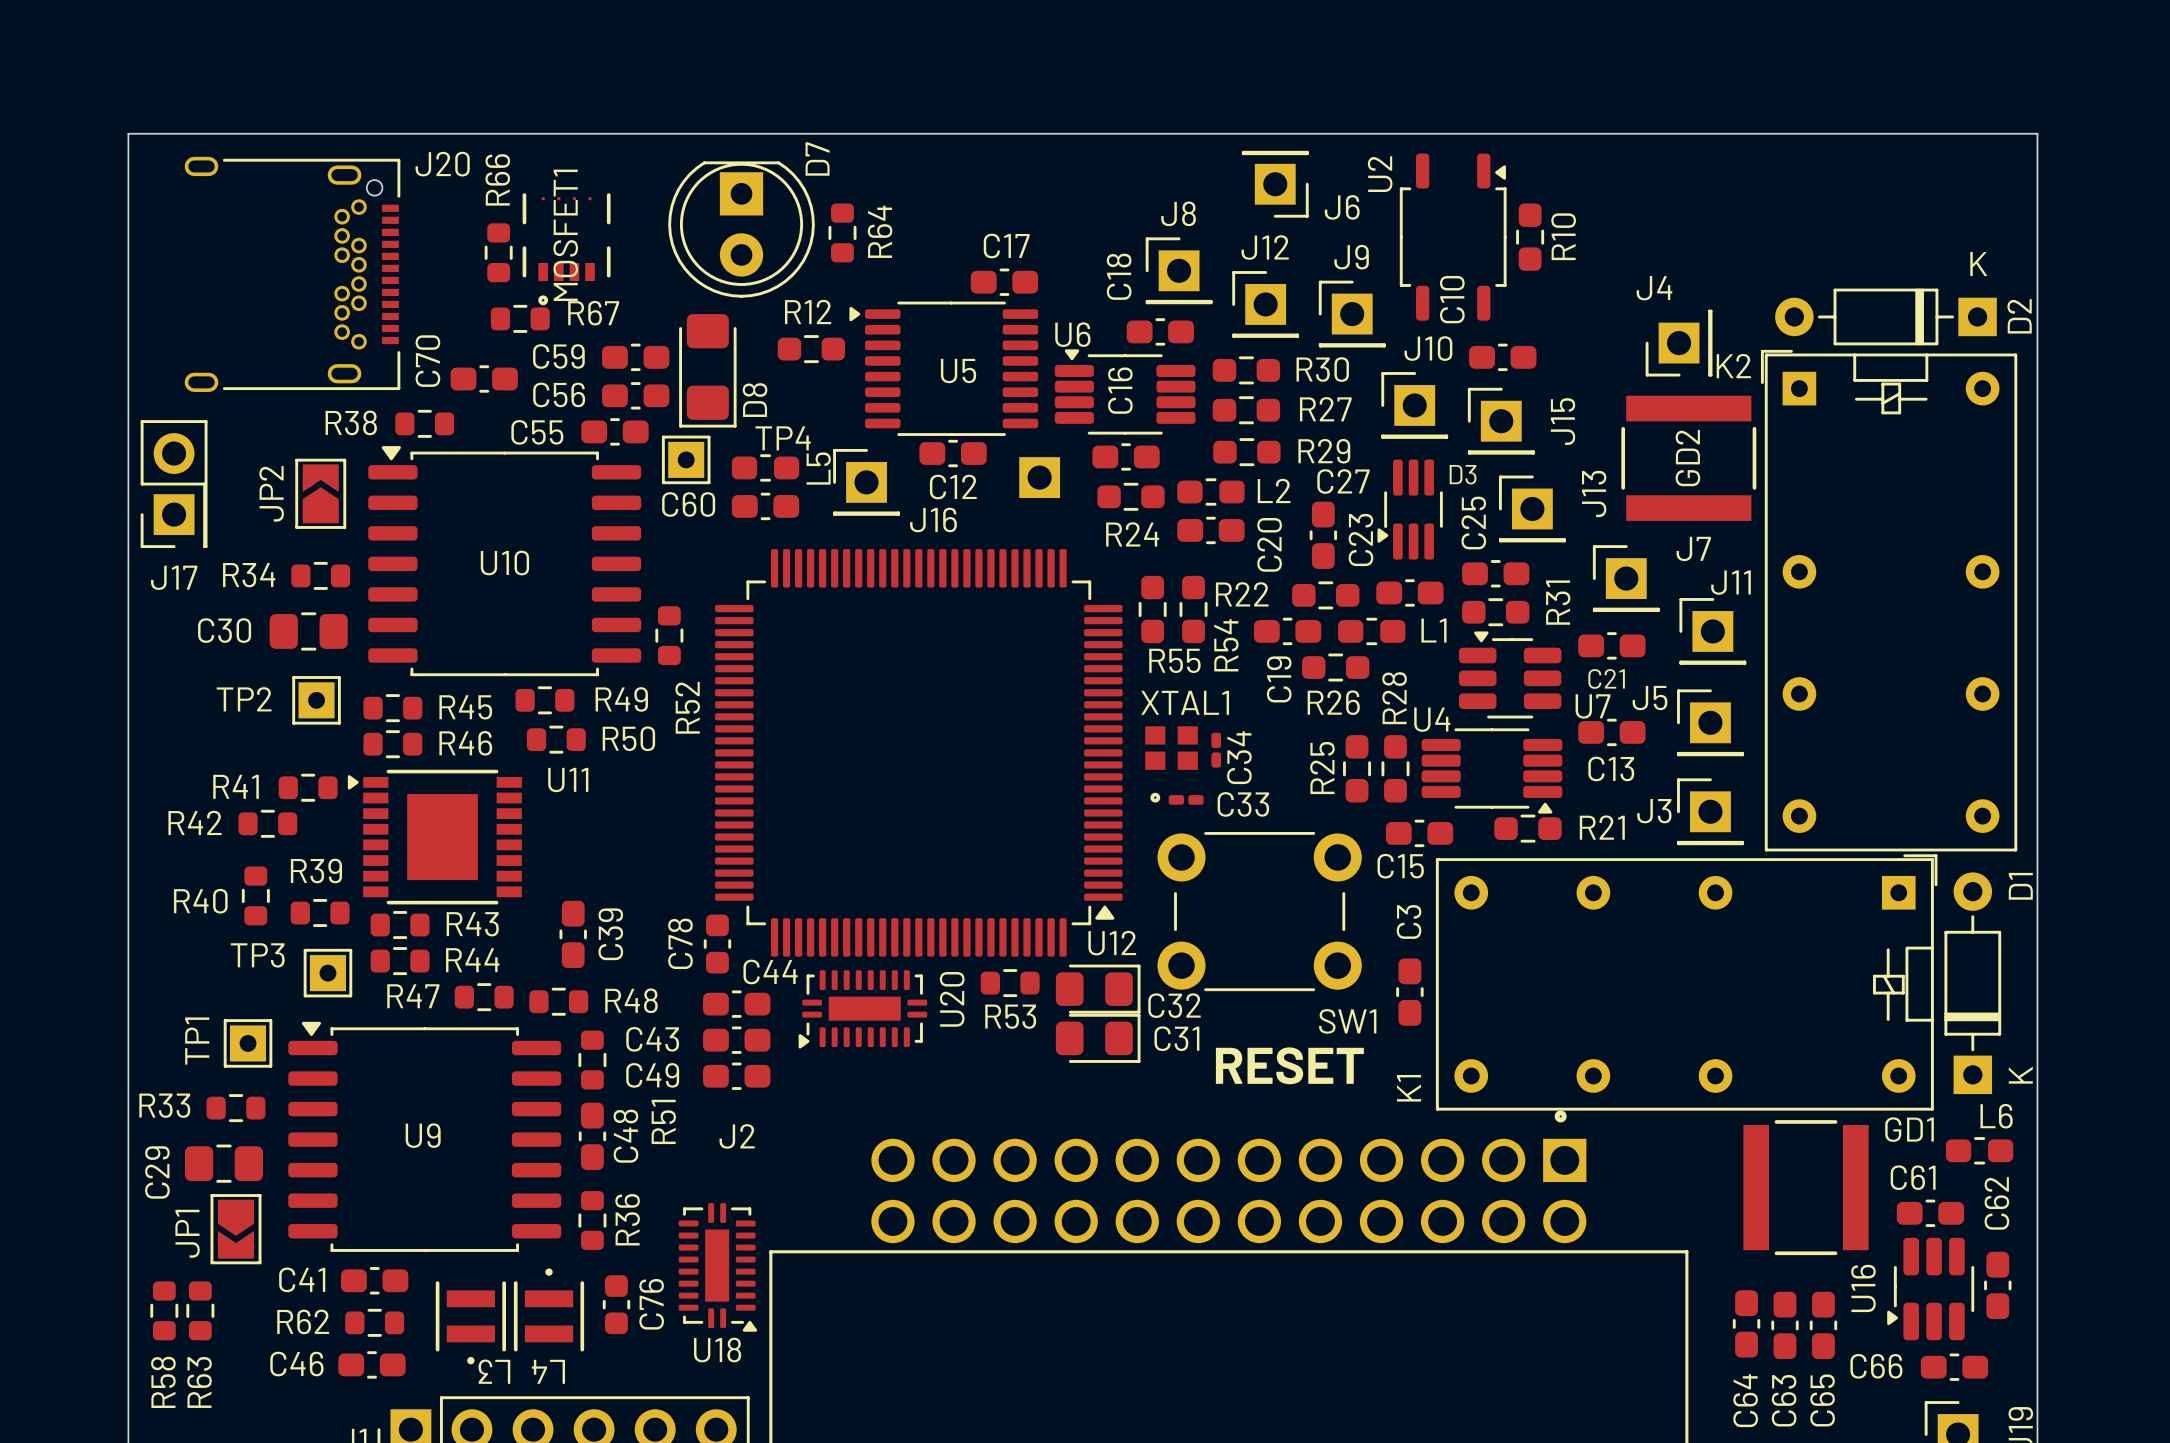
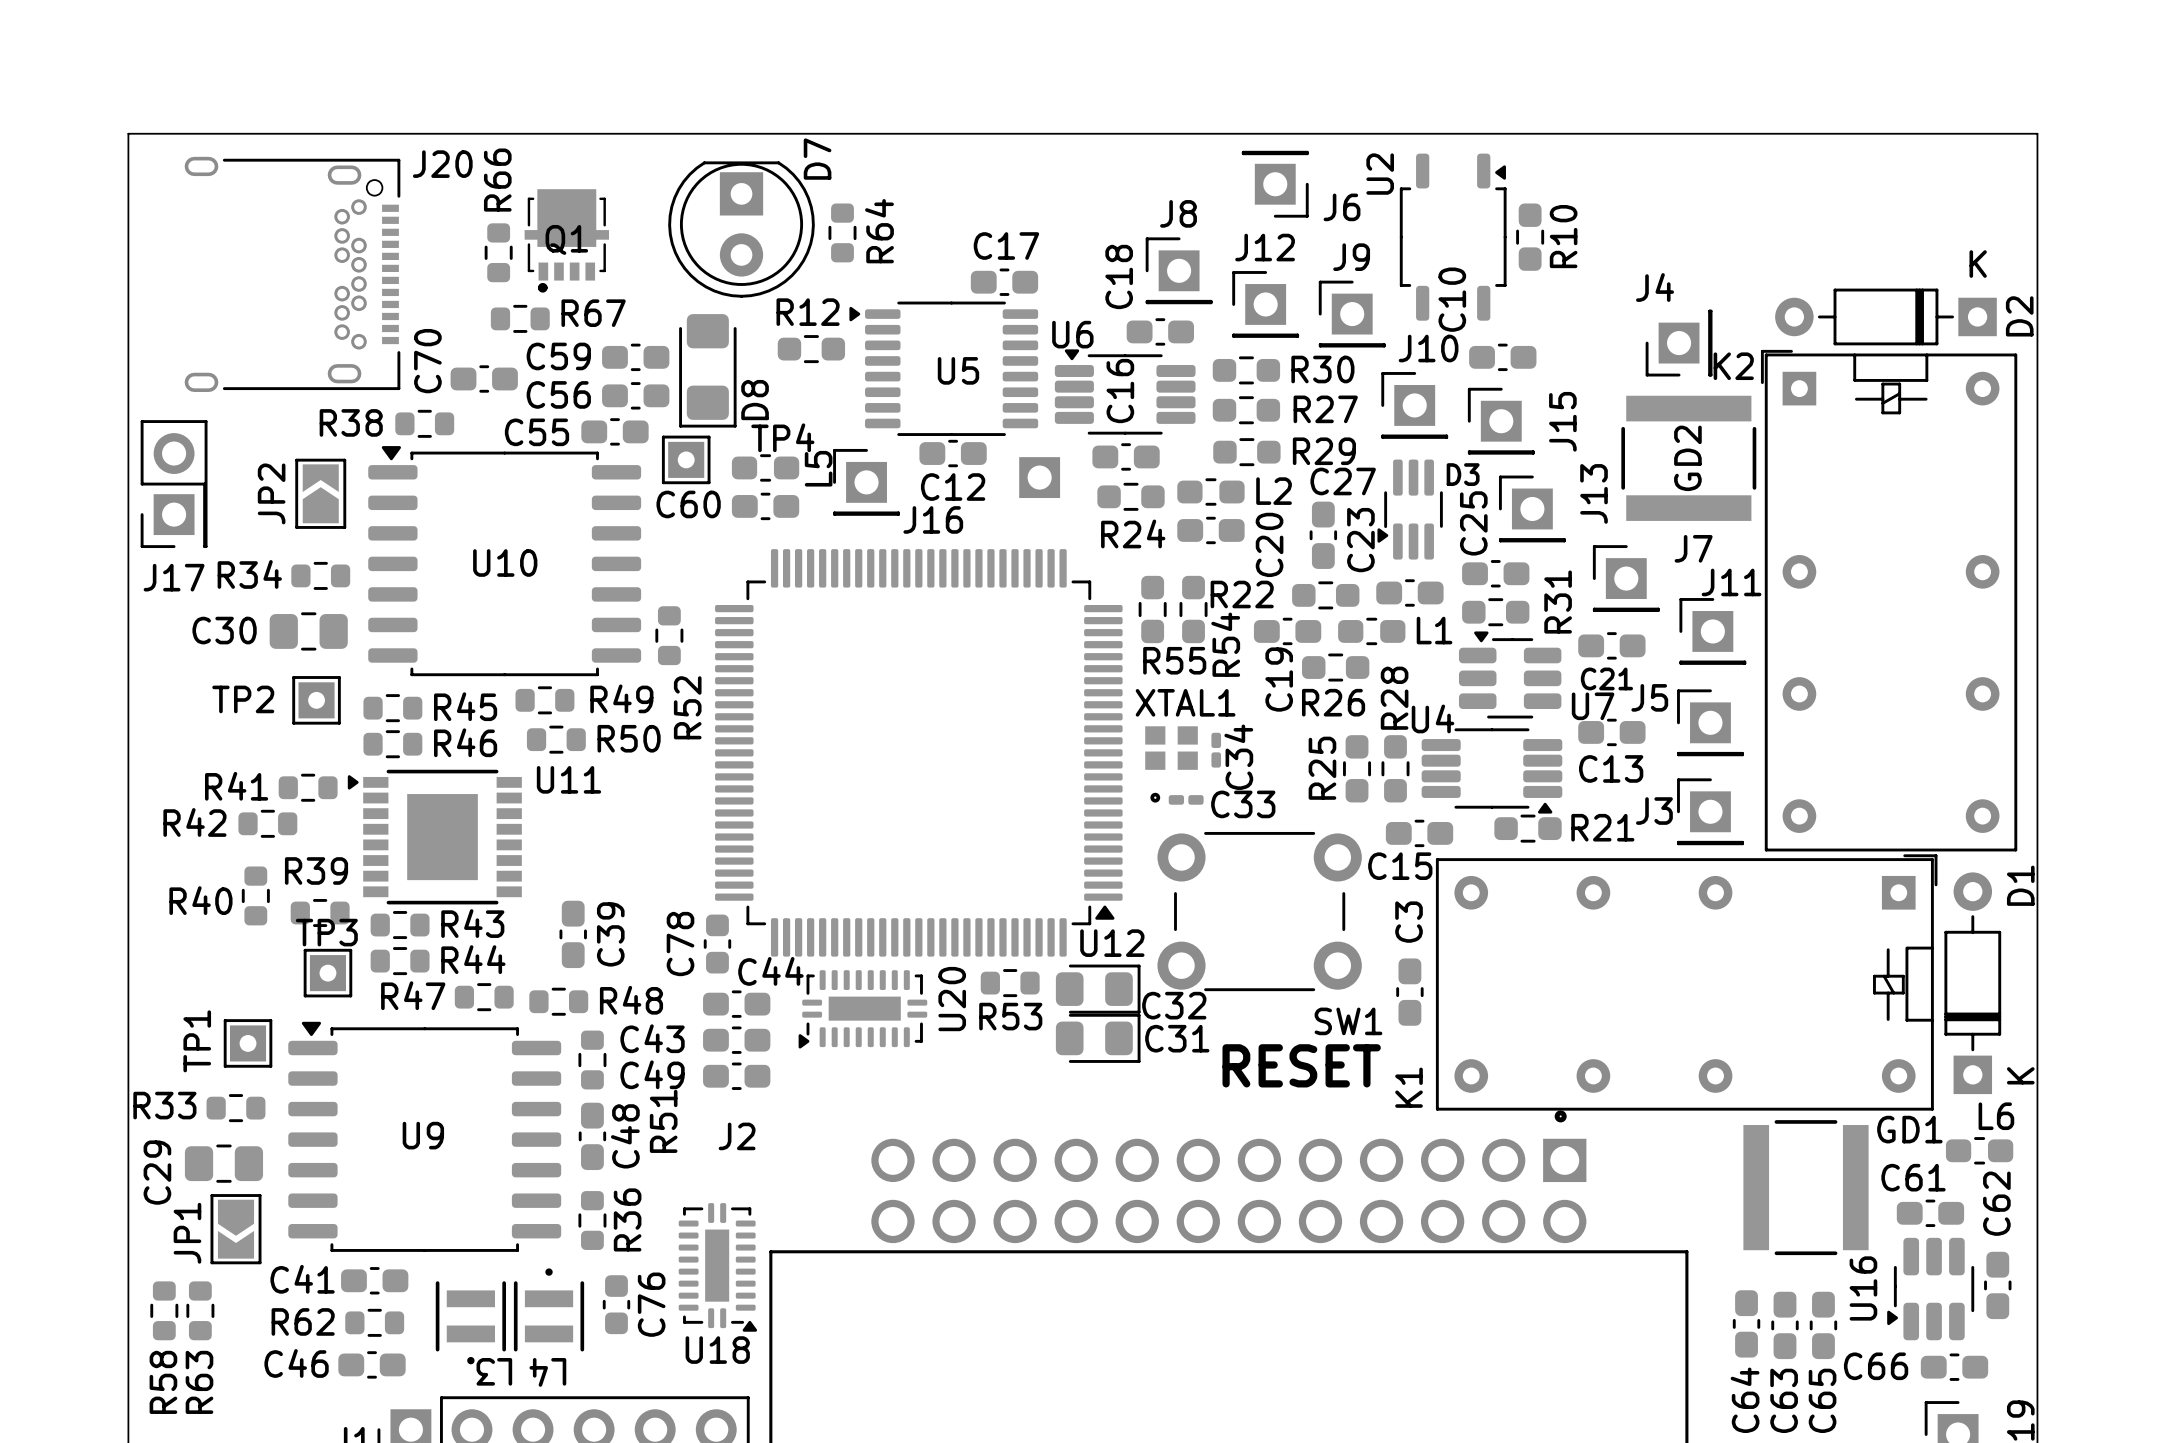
Q1: none -> (566, 240)
MOSFET1: (566, 249) -> none
TP3 name position: TP3 (257, 955) -> TP3 (326, 932)

